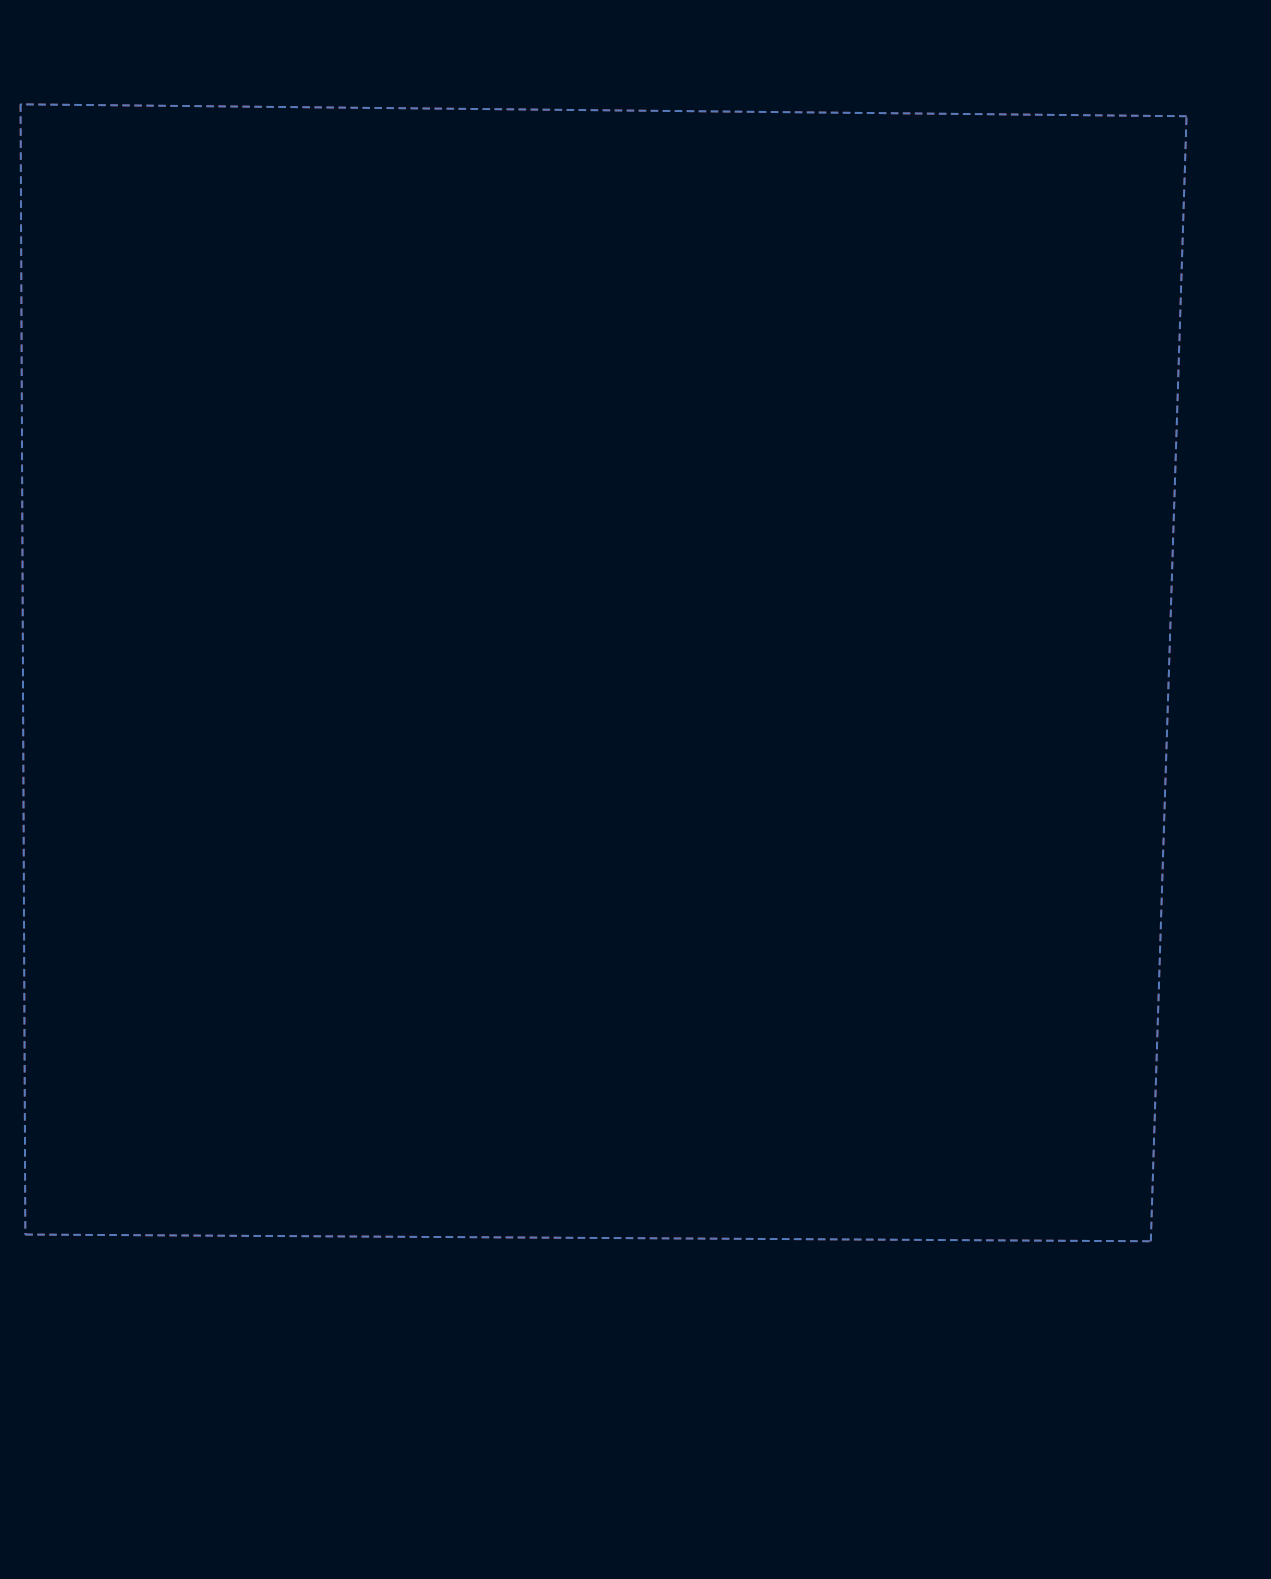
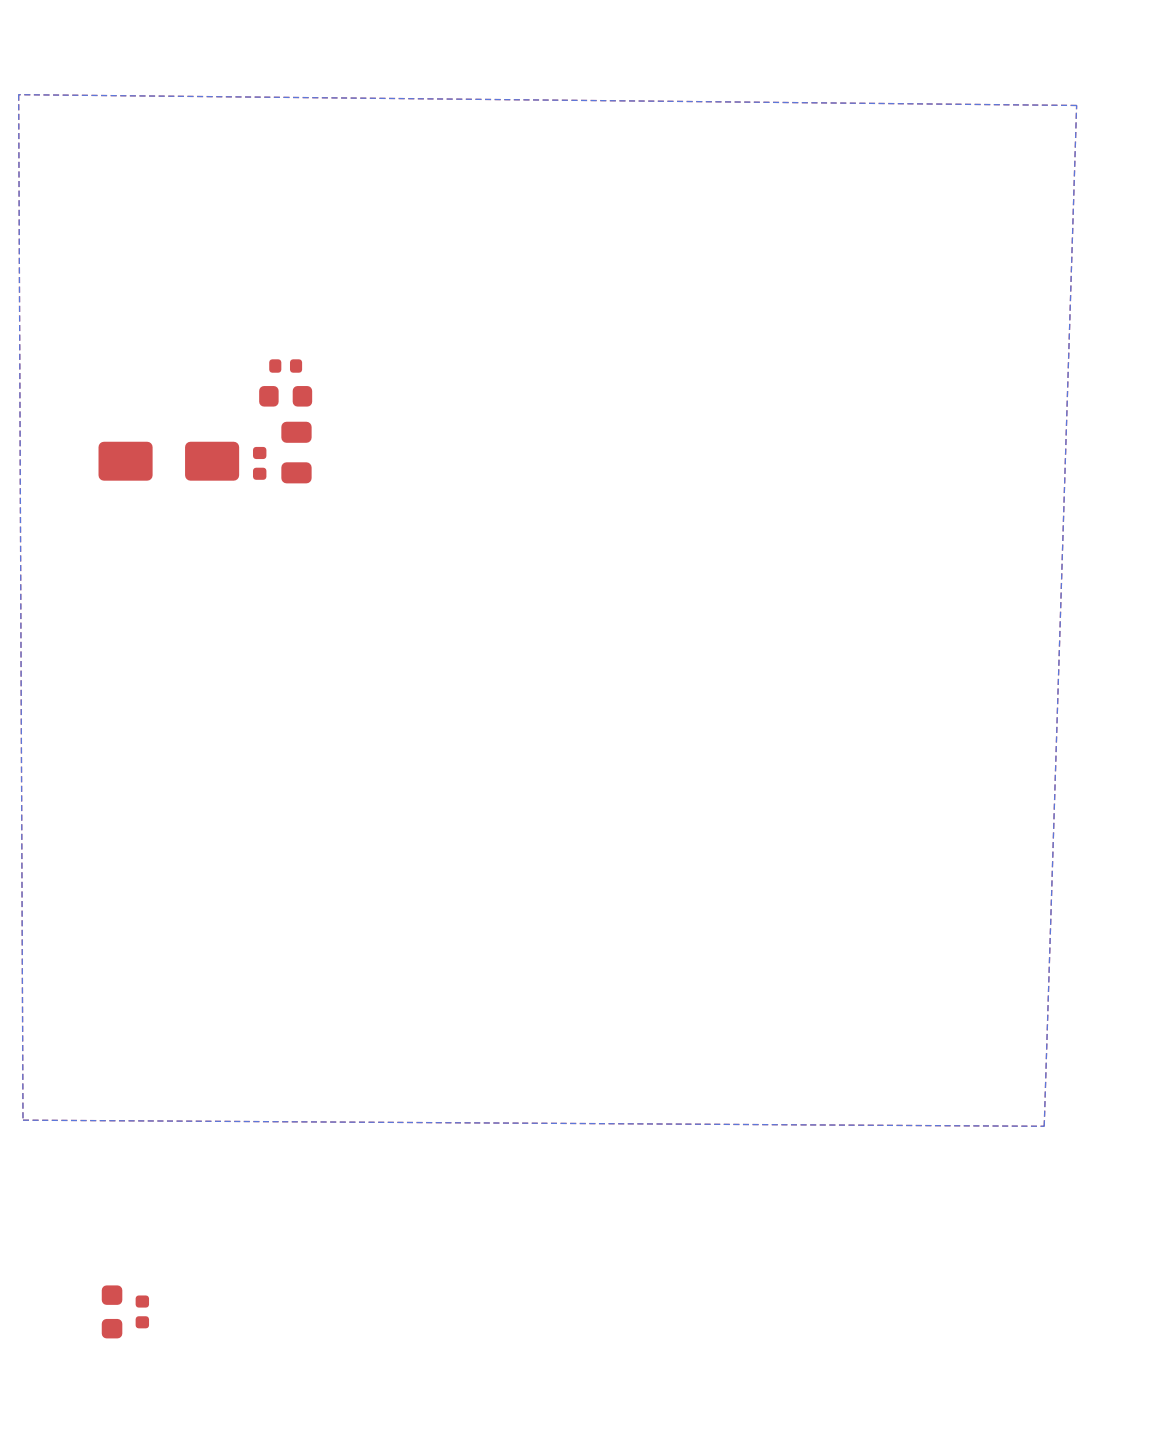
part: none -> (285, 366)
part: none -> (285, 396)
part: none -> (296, 452)
part: none -> (168, 461)
part: none -> (259, 463)
part: none -> (112, 1311)
part: none -> (142, 1311)

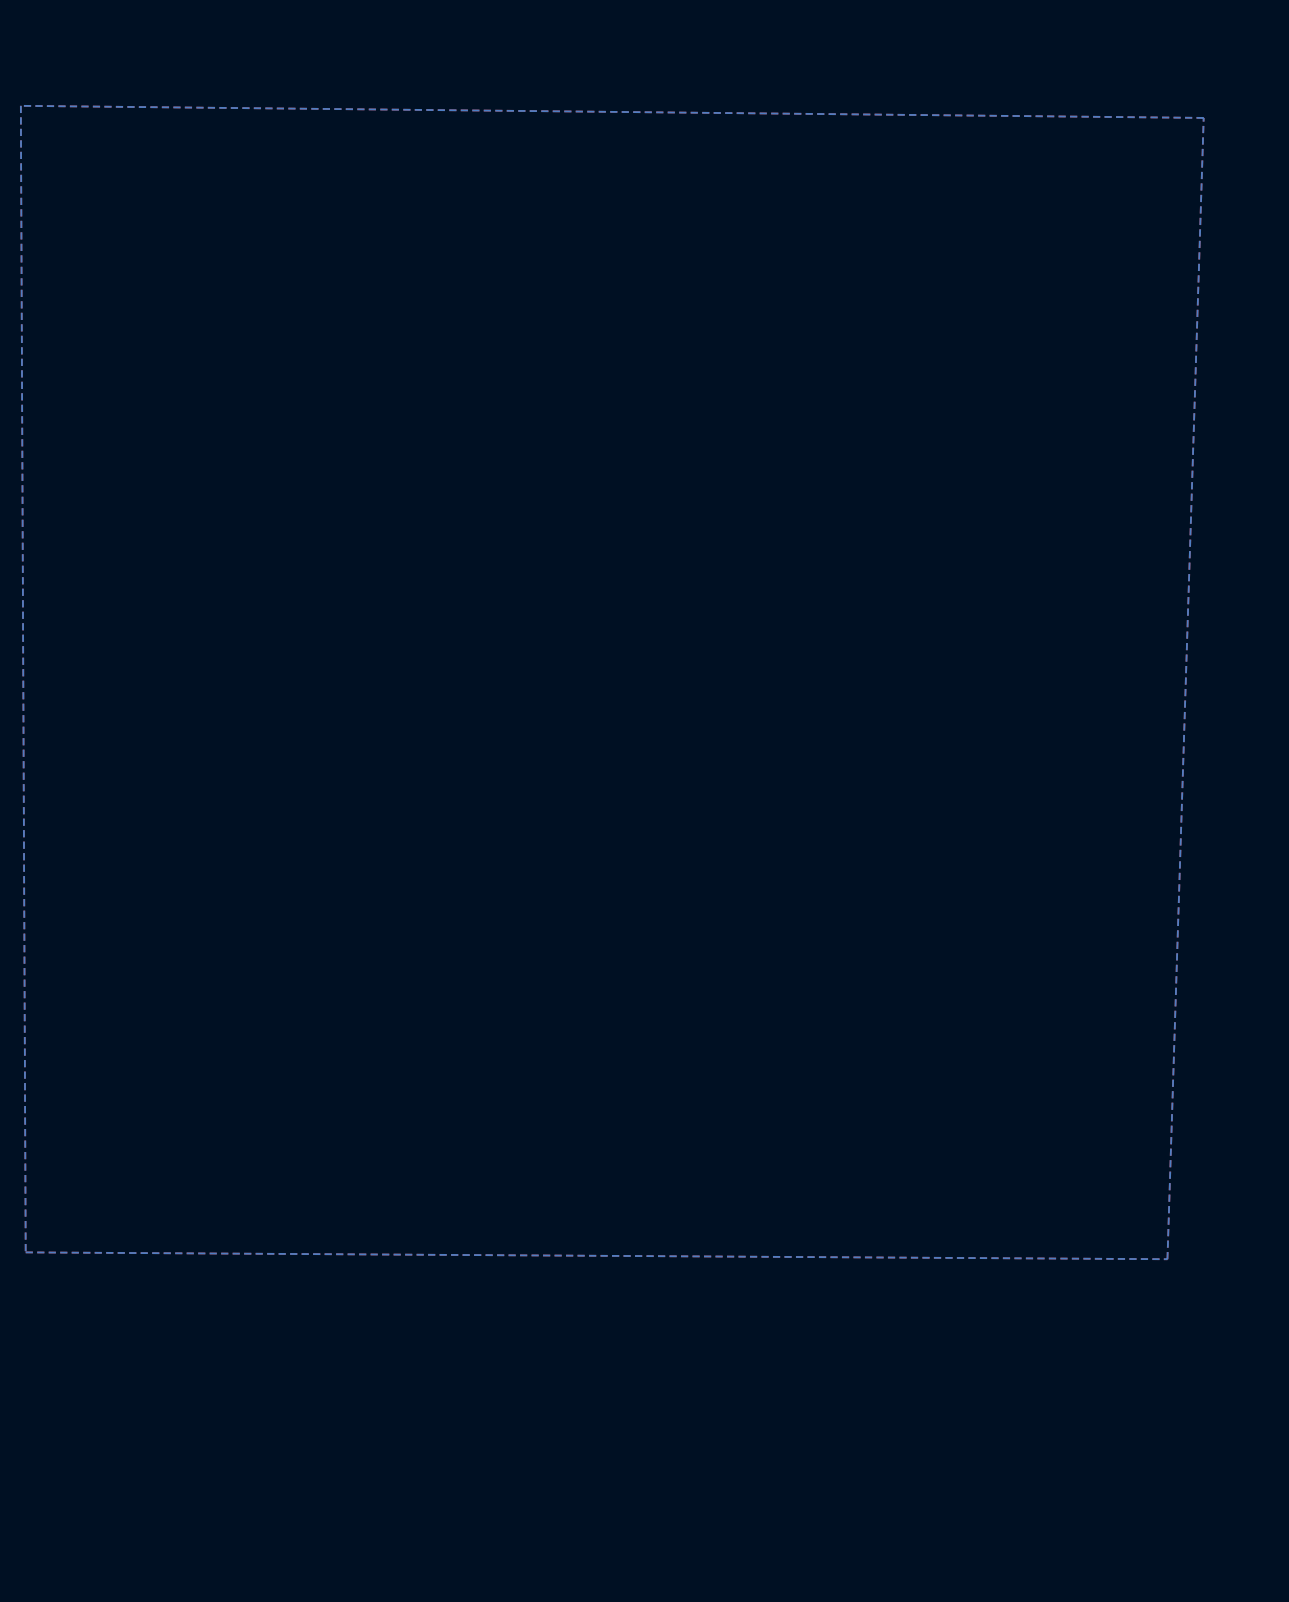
part: (285, 366) -> none
part: (285, 396) -> none
part: (296, 452) -> none
part: (168, 461) -> none
part: (259, 463) -> none
part: (112, 1311) -> none
part: (142, 1311) -> none

